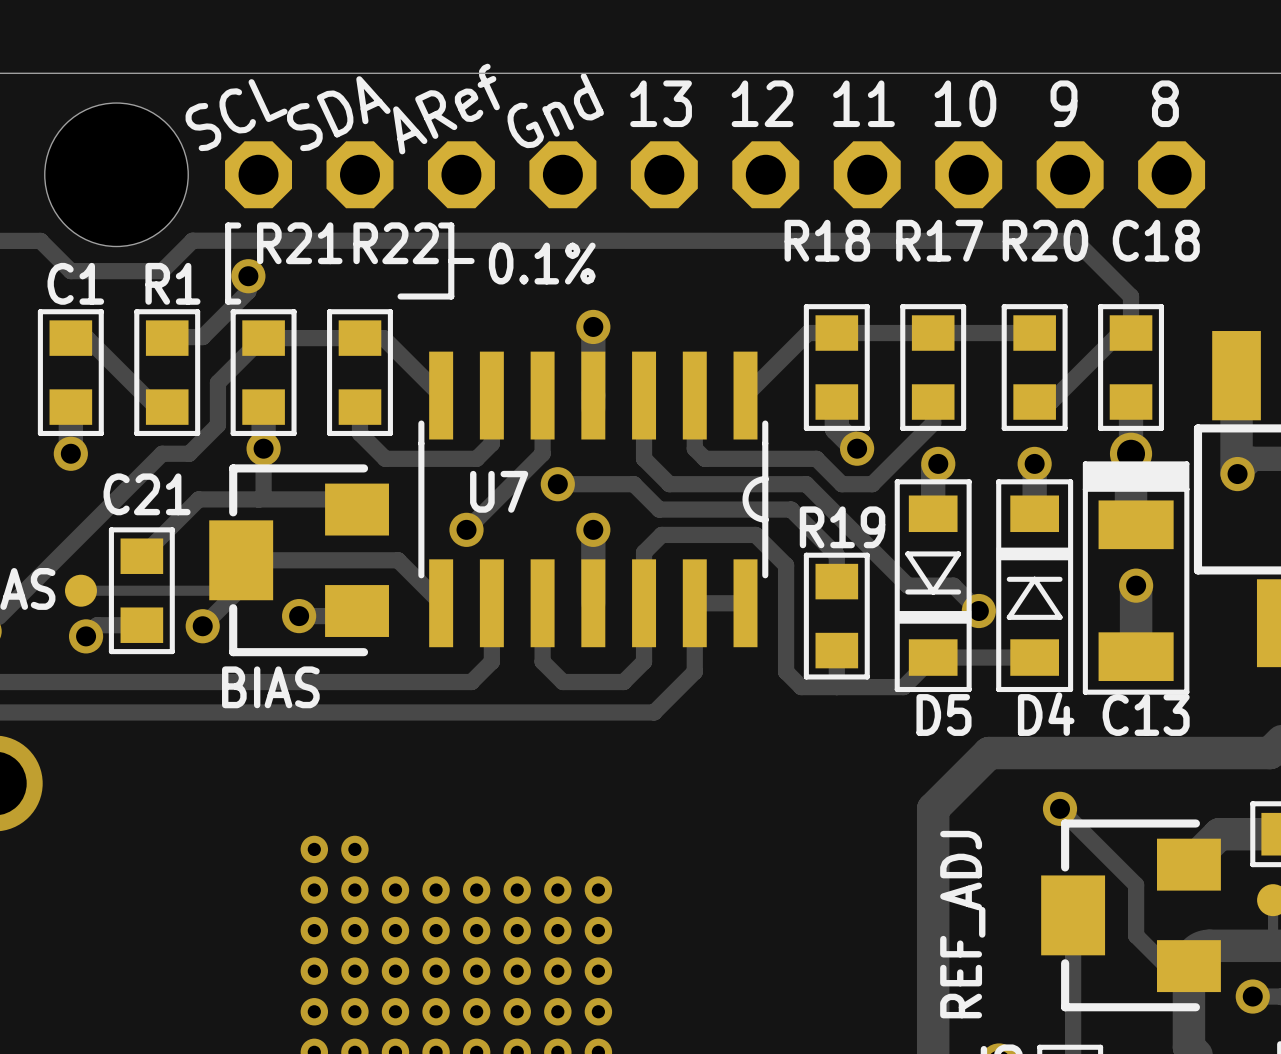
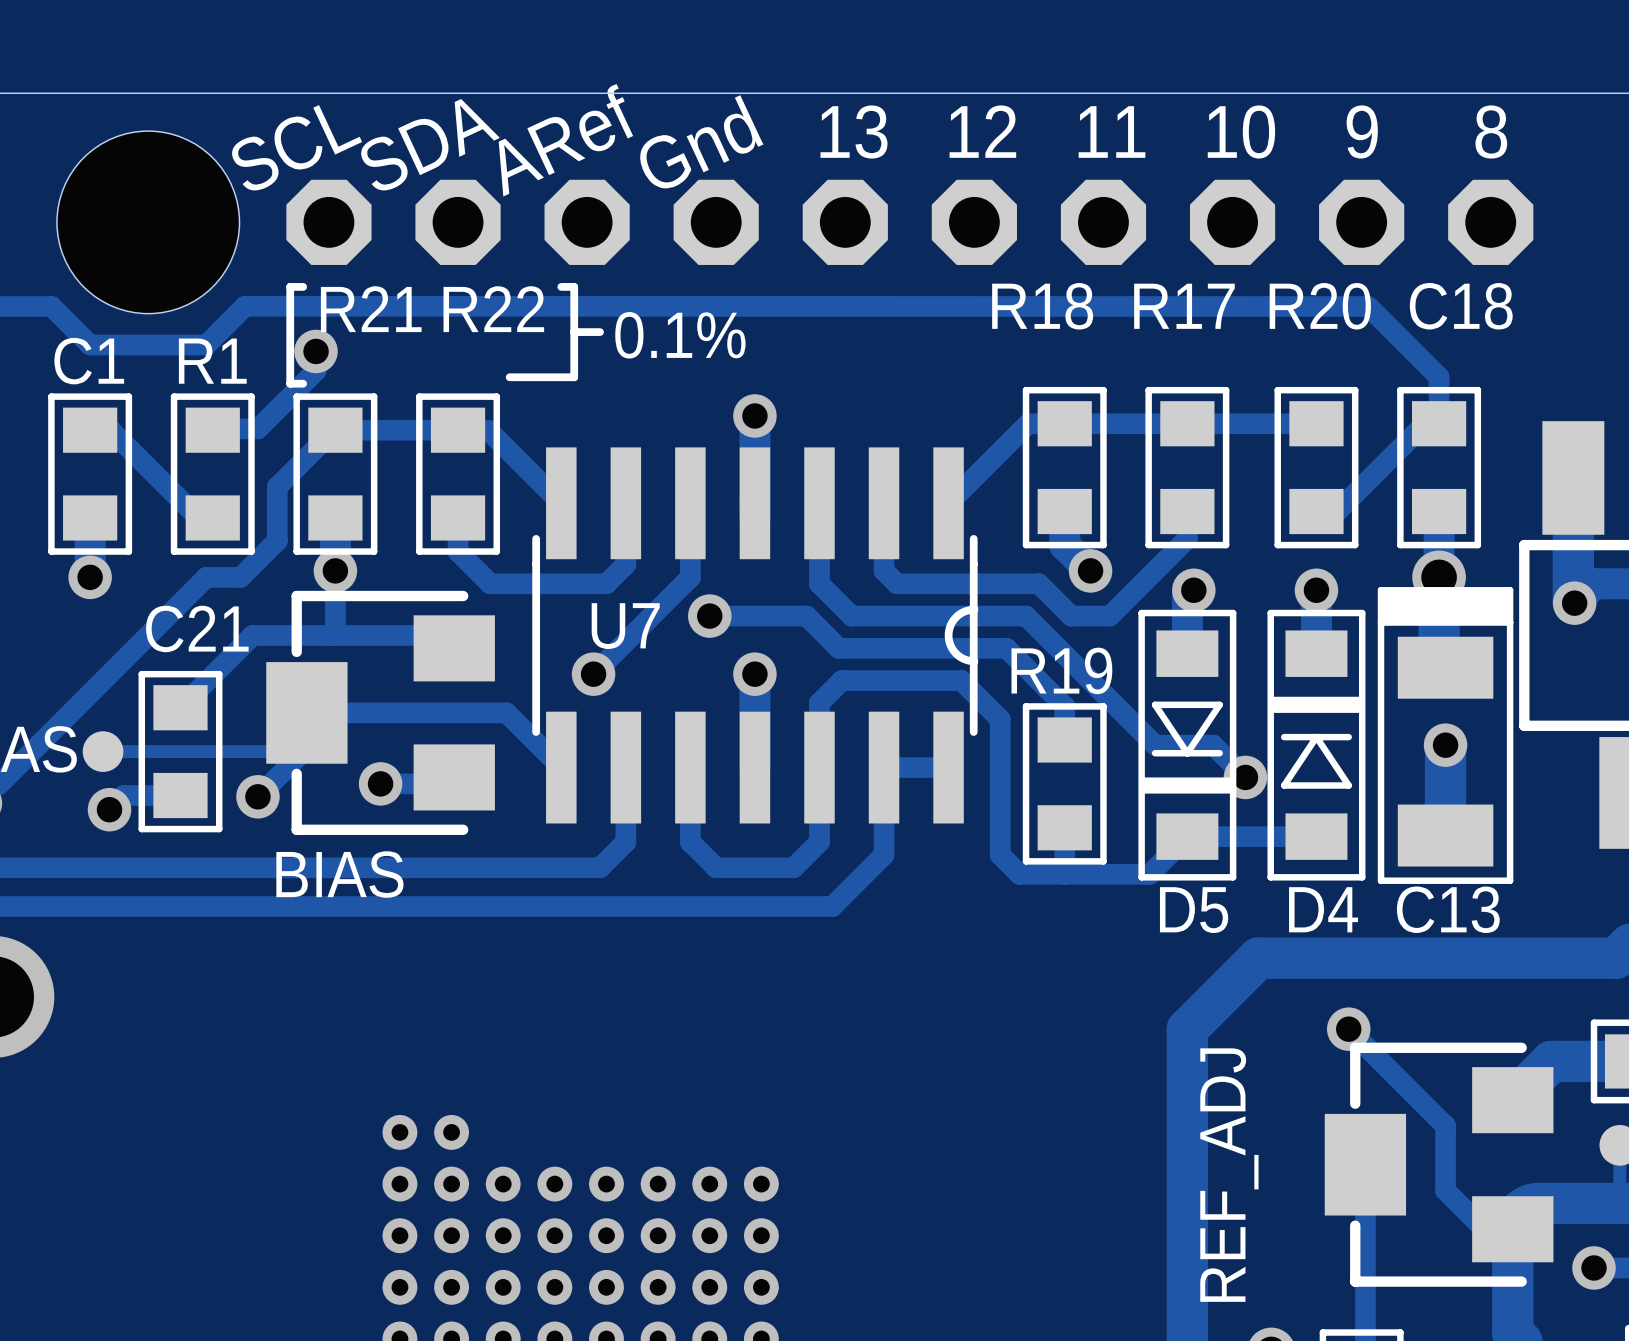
via: (314, 849) -> none
via: (354, 849) -> none
via: (395, 890) -> none
via: (436, 890) -> none
via: (476, 890) -> none
via: (517, 890) -> none
via: (557, 890) -> none
via: (598, 890) -> none

